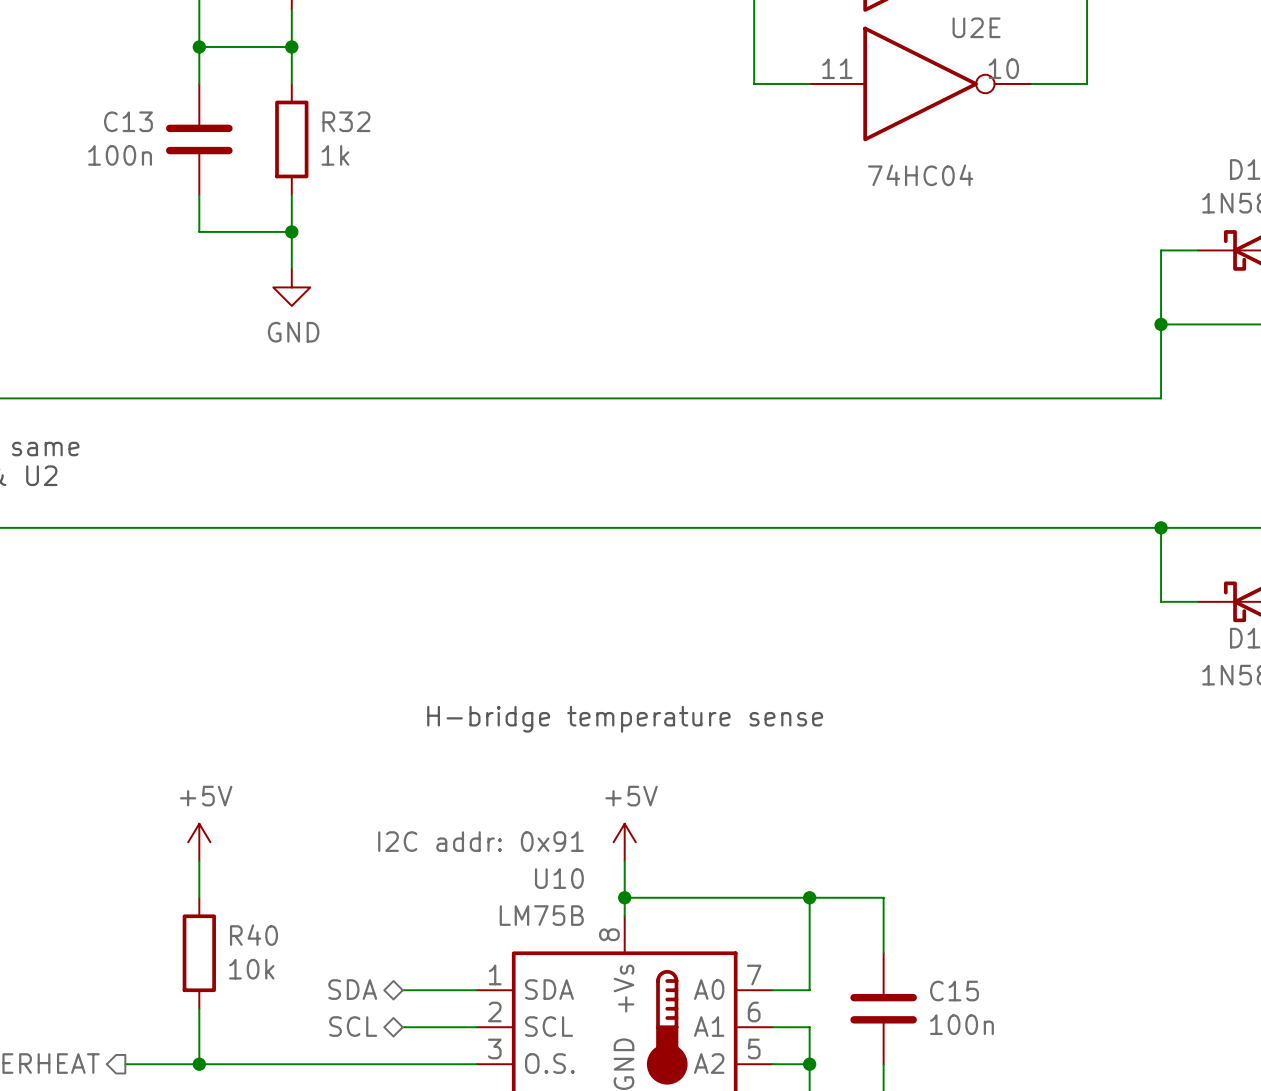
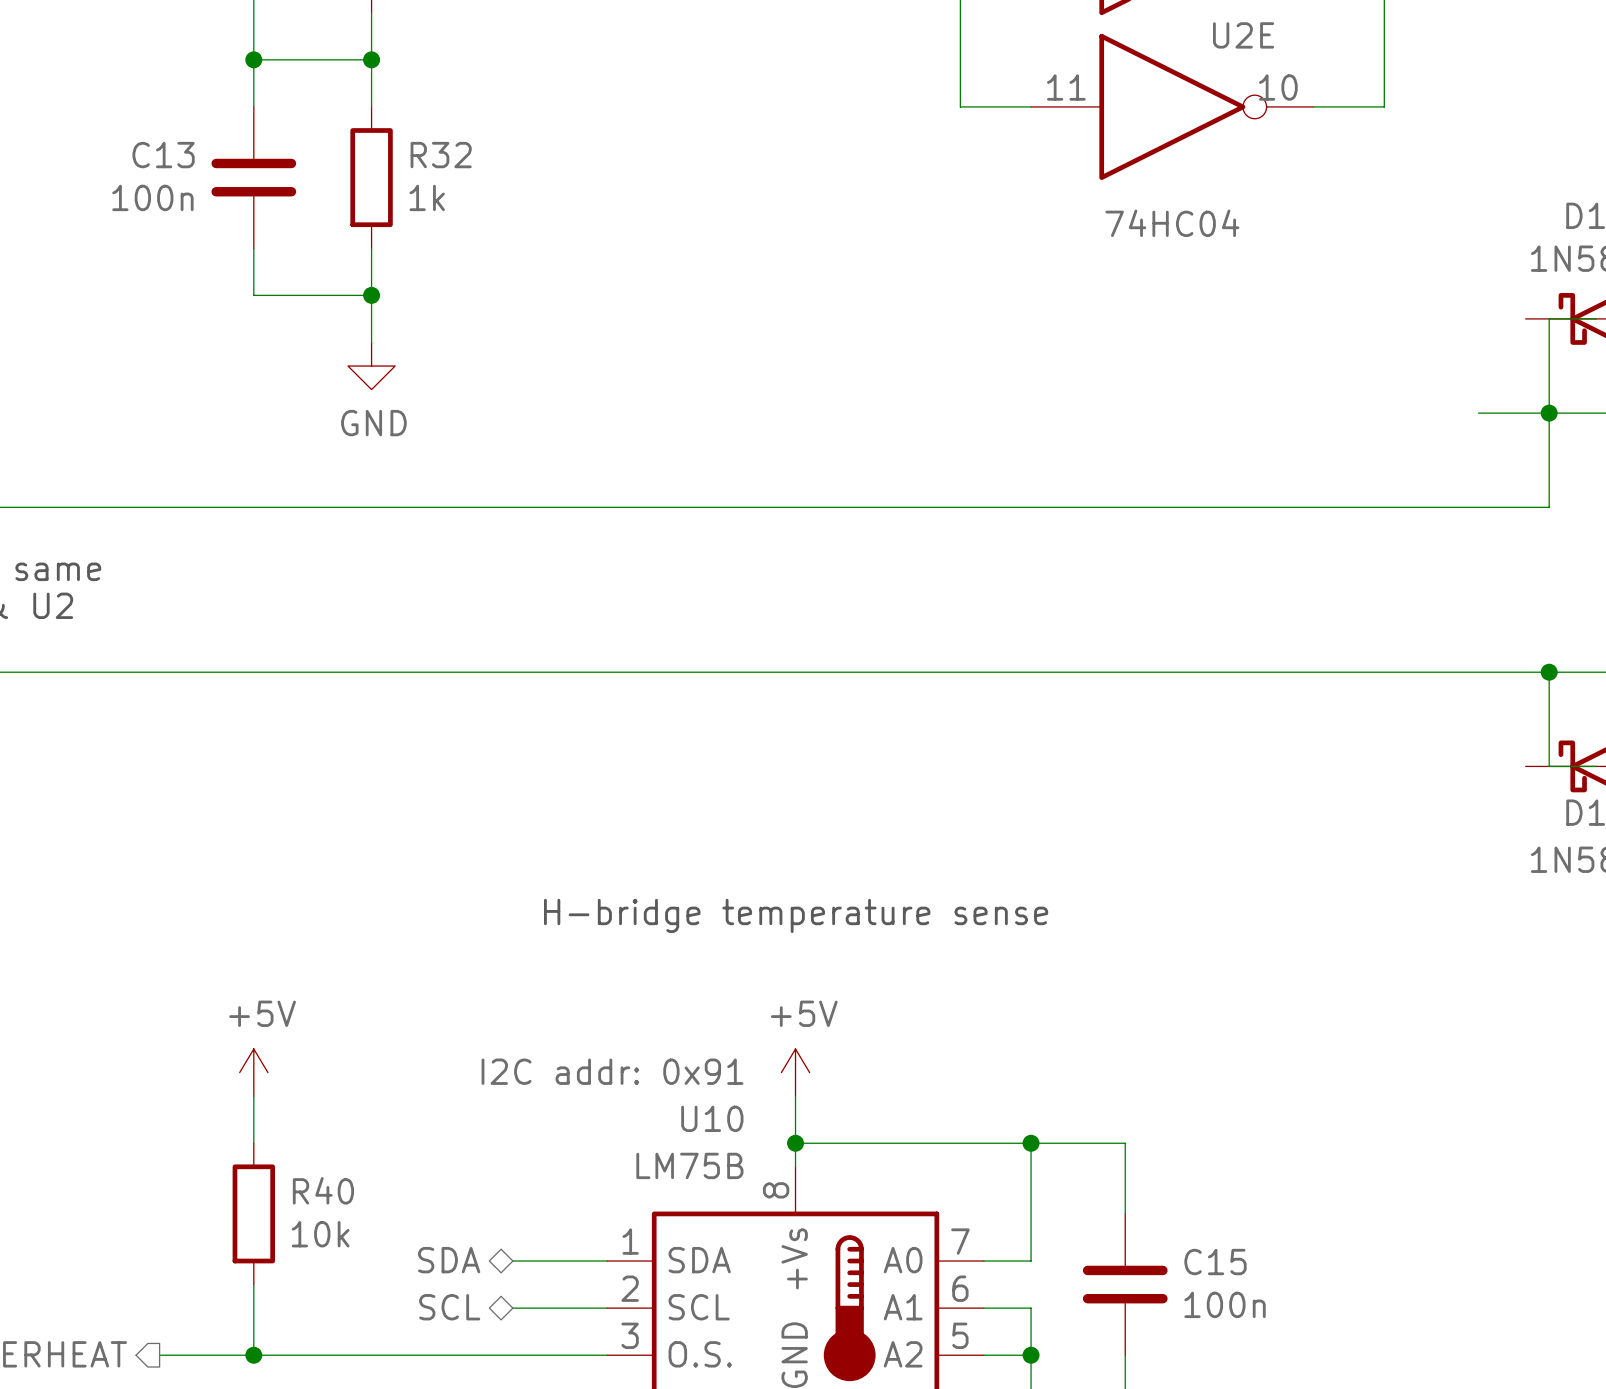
wire: (1198, 250) (1161, 250) (1161, 398) -> (1596, 318) (1549, 318) (1549, 507) (1478, 507)
junction position: (1161, 324) -> (1549, 413)
wire: (1161, 527) (1161, 601) (1198, 601) -> (1549, 672) (1549, 766) (1596, 766)
junction position: (1161, 527) -> (1549, 672)

